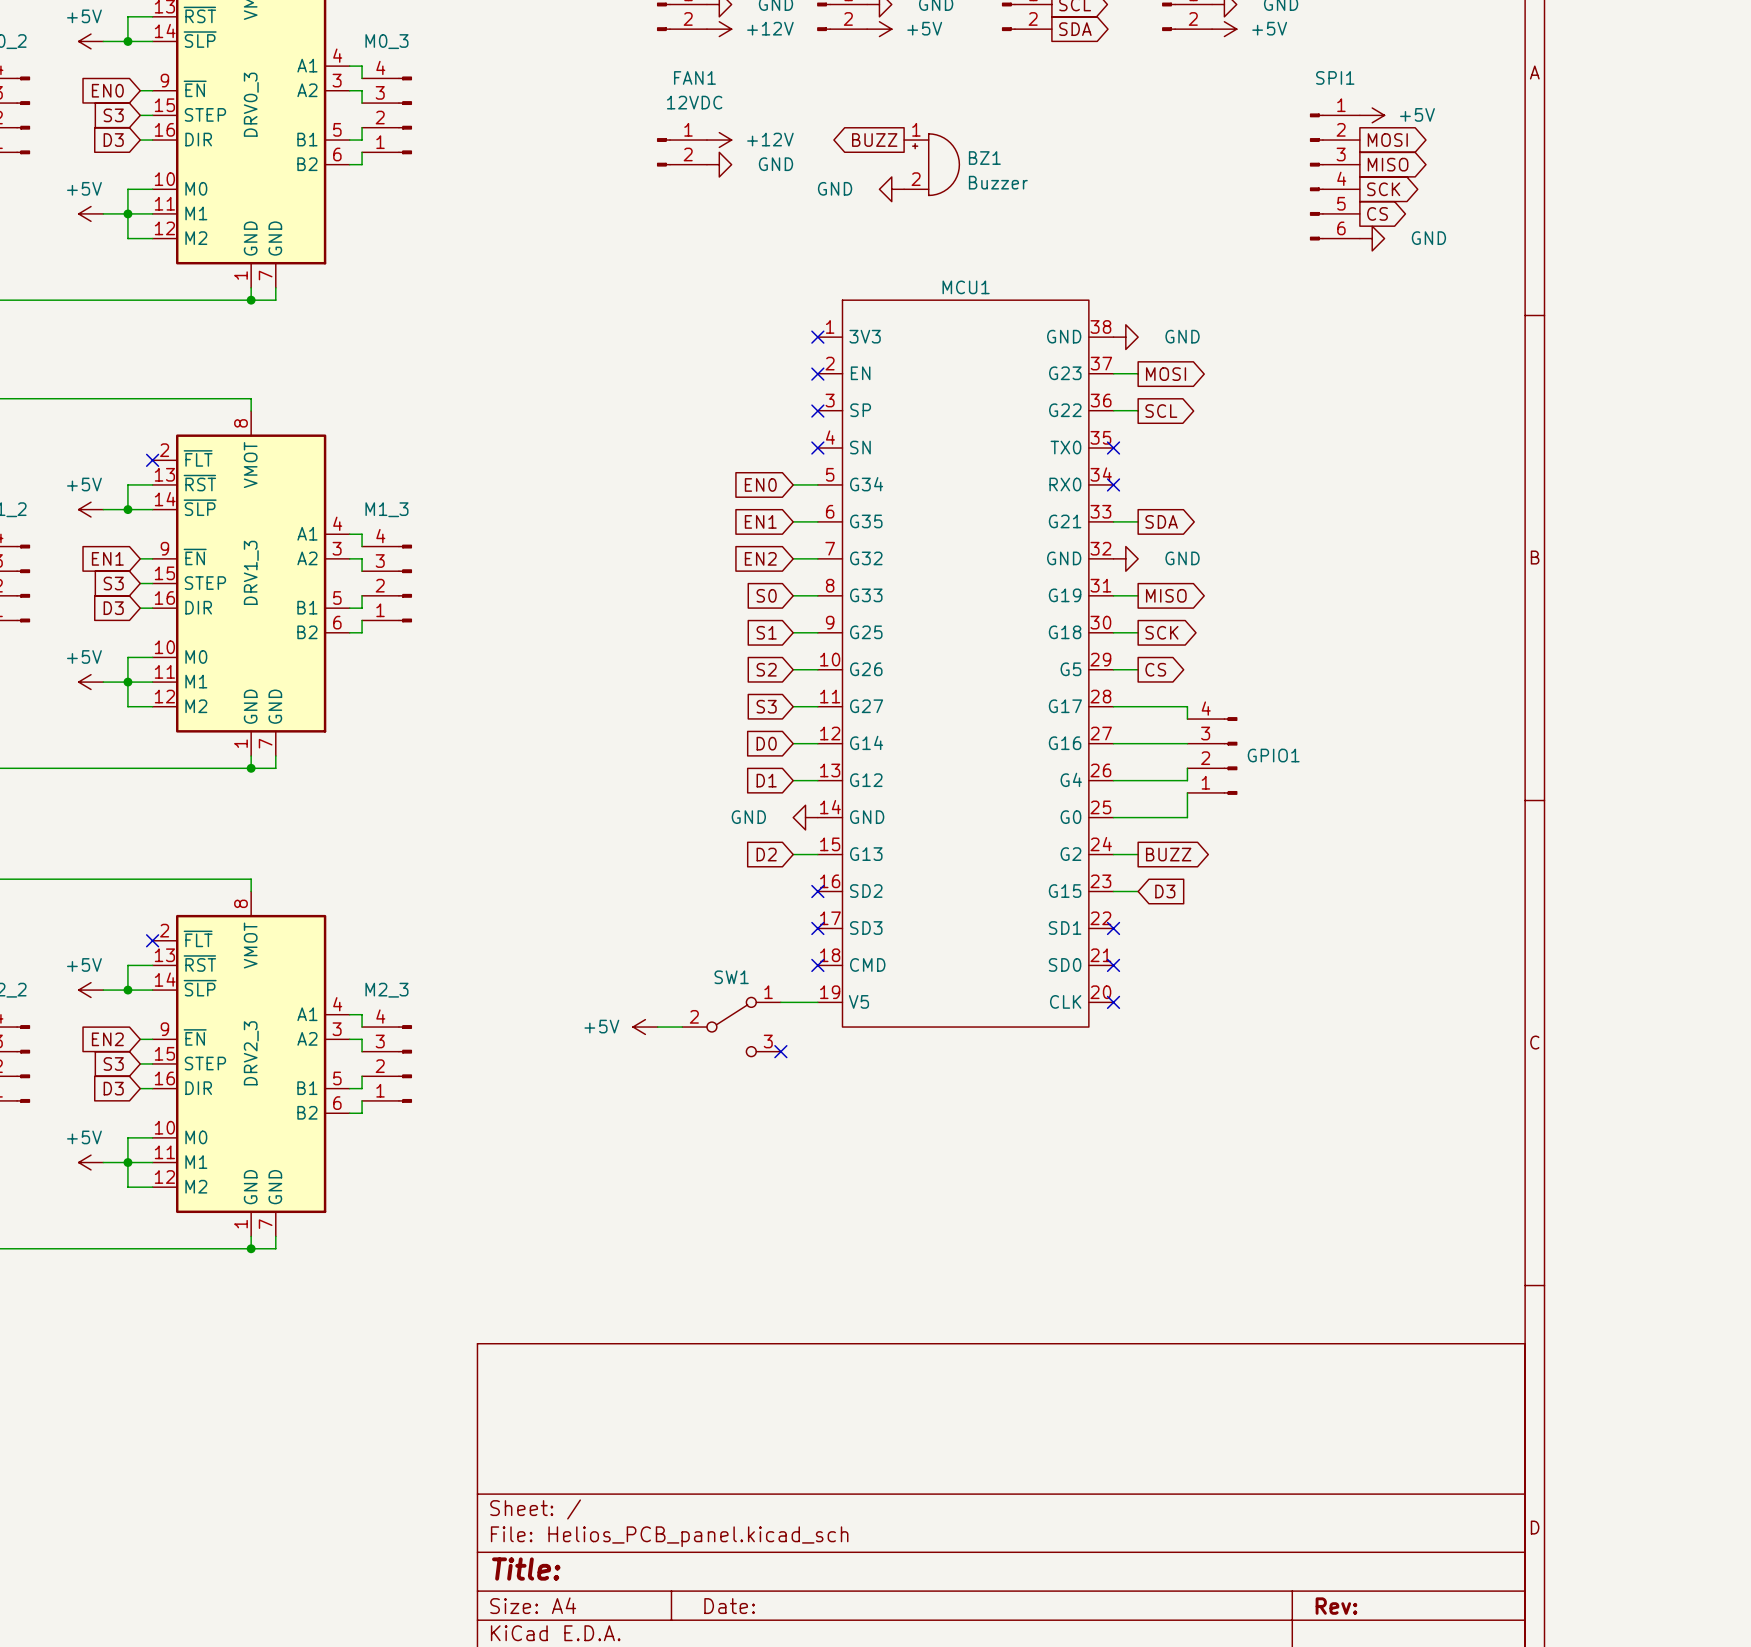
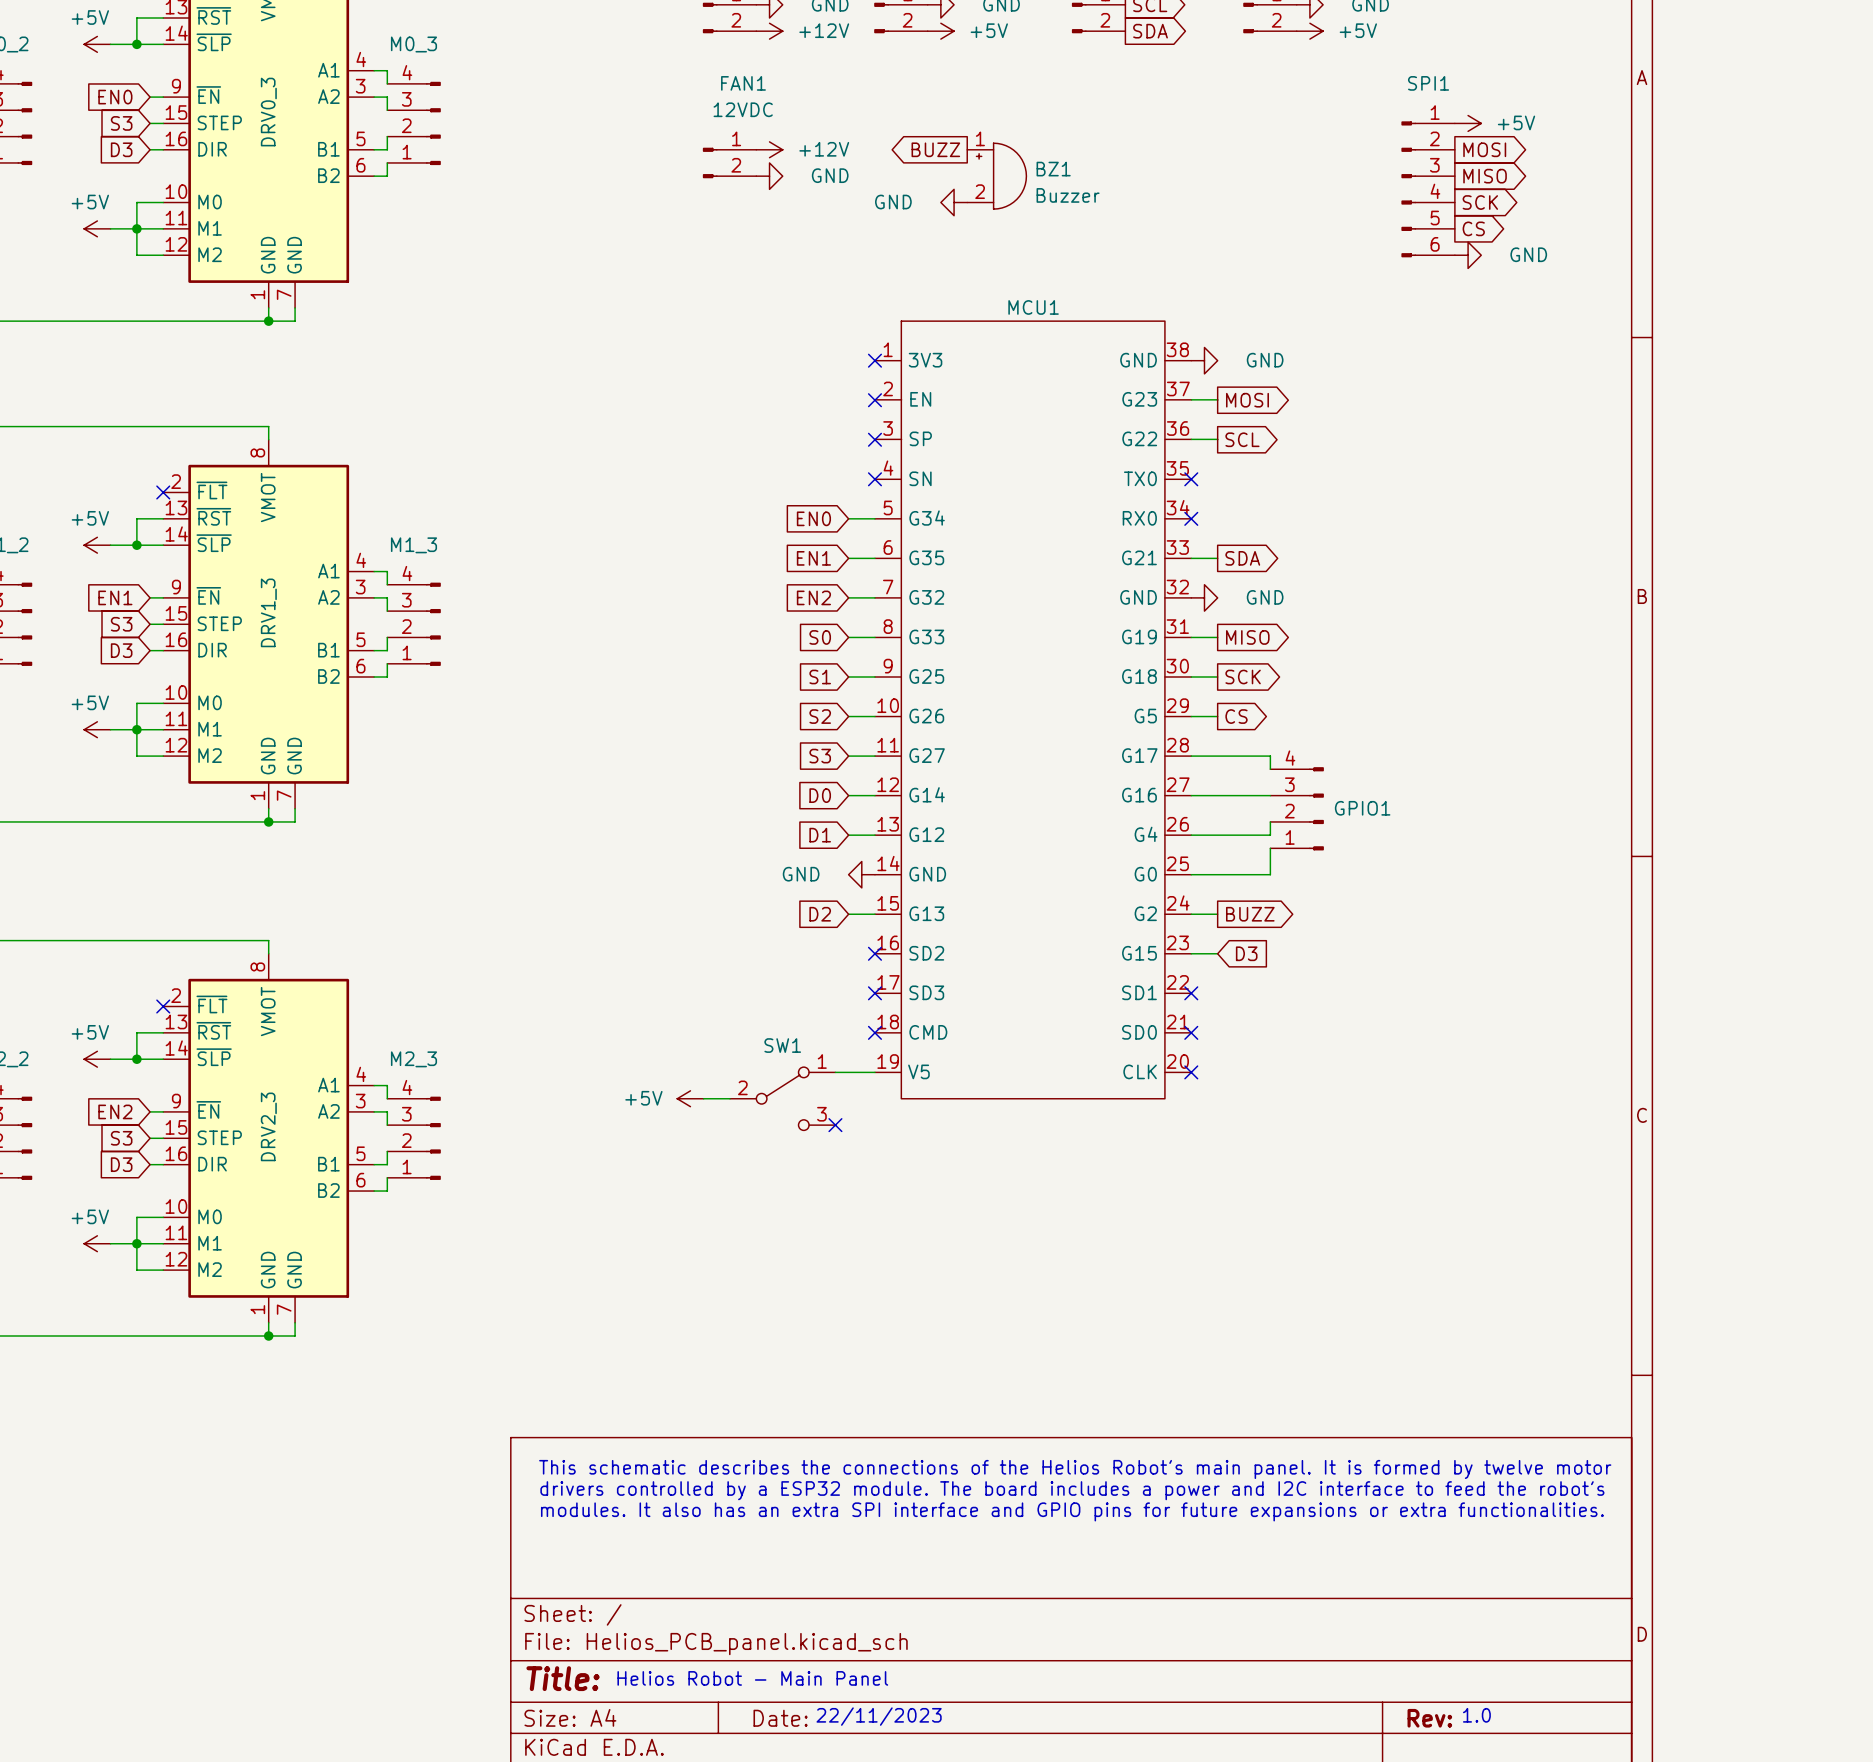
text: none -> This schematic describes the connections of the Helios Robot's main panel. It is formed by twelve motor (1075, 1469)
text: none -> drivers controlled by a ESP32 module. The board includes a power and I2C interface to feed the robot's (1072, 1490)
text: none -> modules. It also has an extra SPI interface and GPIO pins for future expansions or extra functionalities. (1072, 1511)
text: none -> Helios Robot - Main Panel (752, 1678)
text: none -> 1.0 (1476, 1715)
text: none -> 22/11/2023 (879, 1716)

